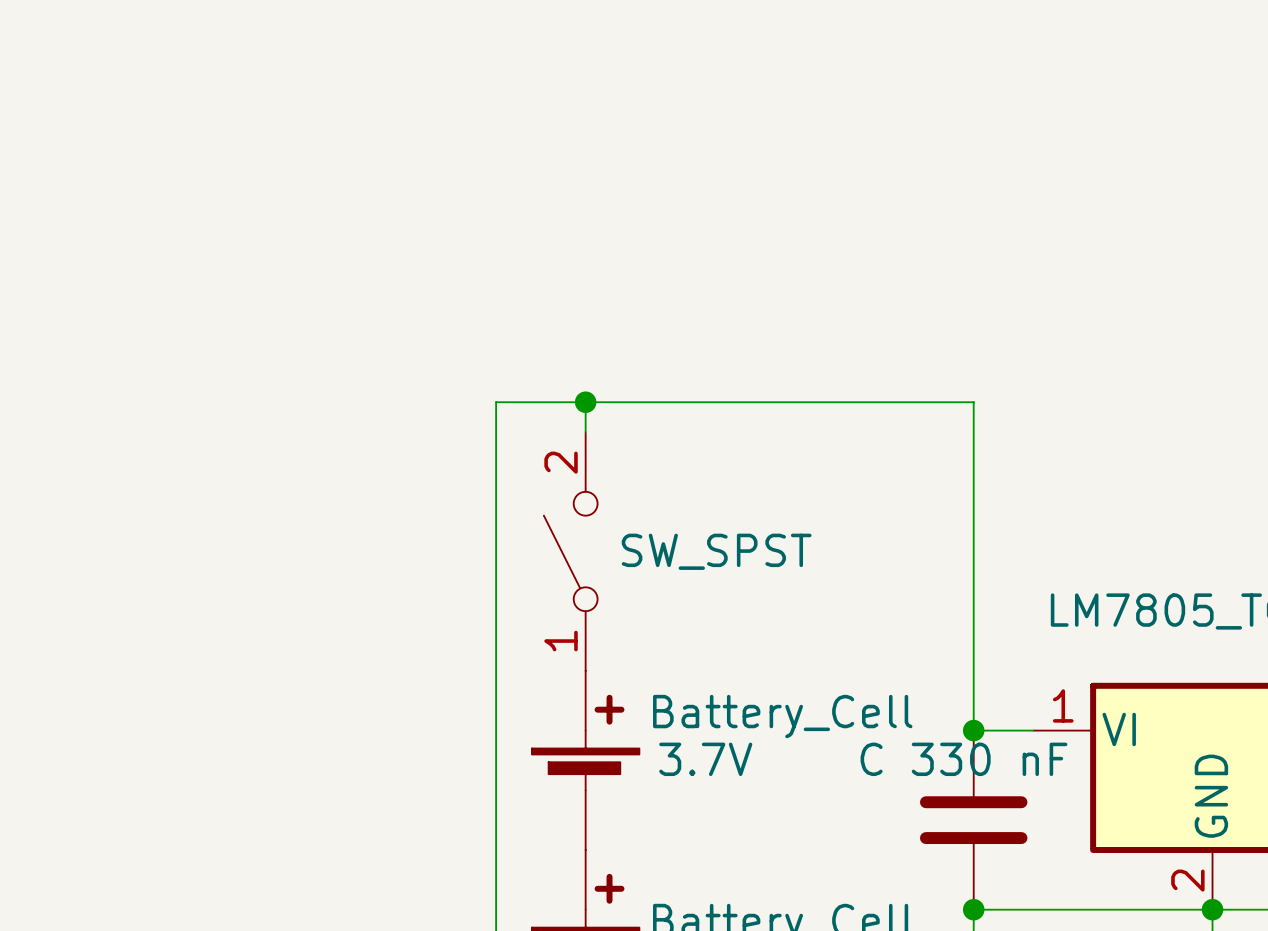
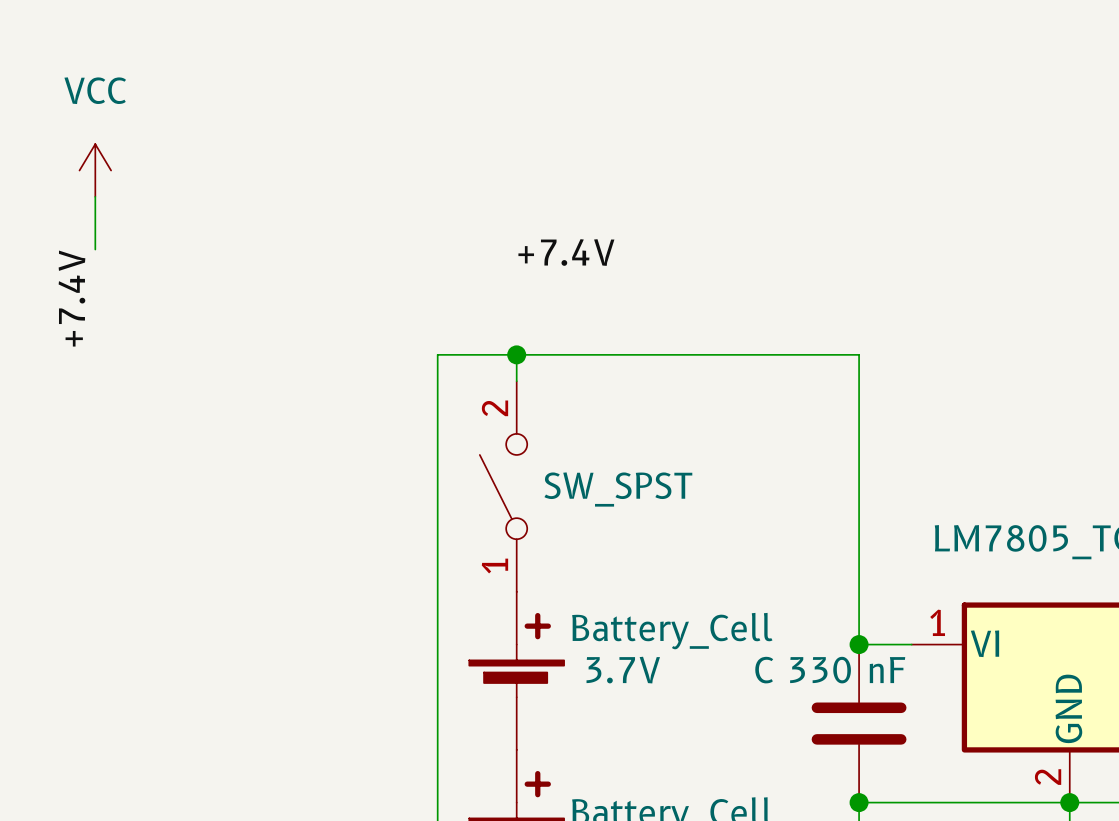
power symbol: none -> VCC (95, 170)
wire: none -> (95, 196) (95, 249)
label: none -> +7.4V (566, 252)
label: none -> +7.4V (71, 298)

